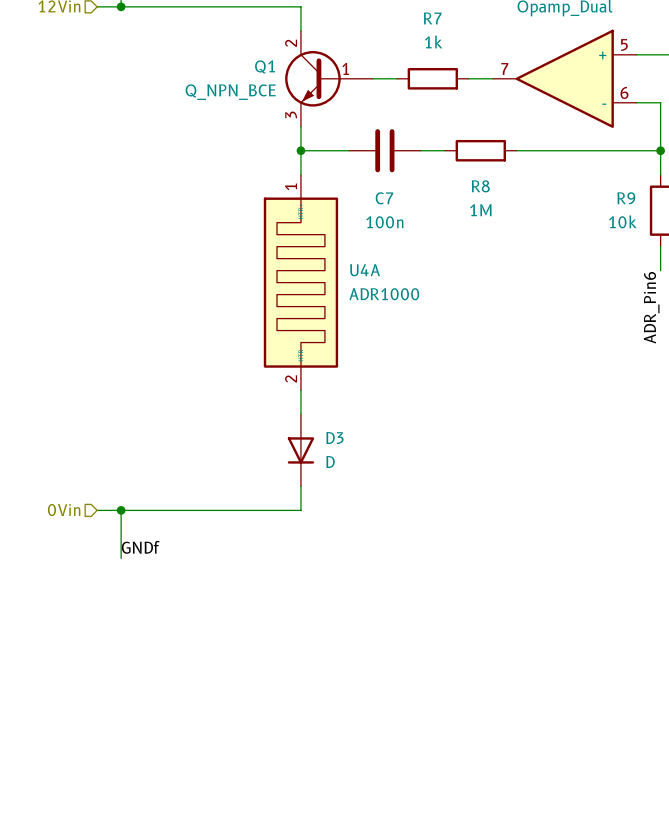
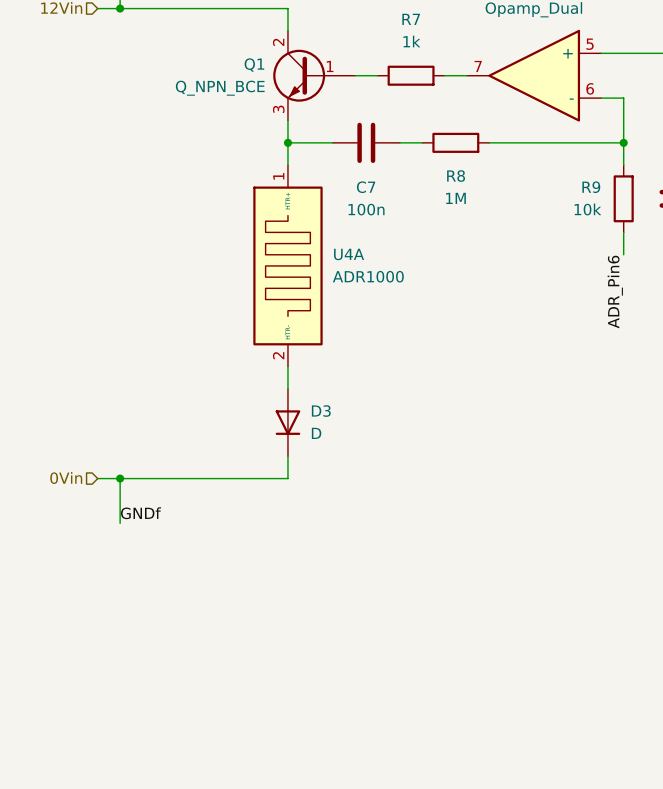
U4A symbol: [263, 174, 339, 391] -> [253, 165, 323, 367]

